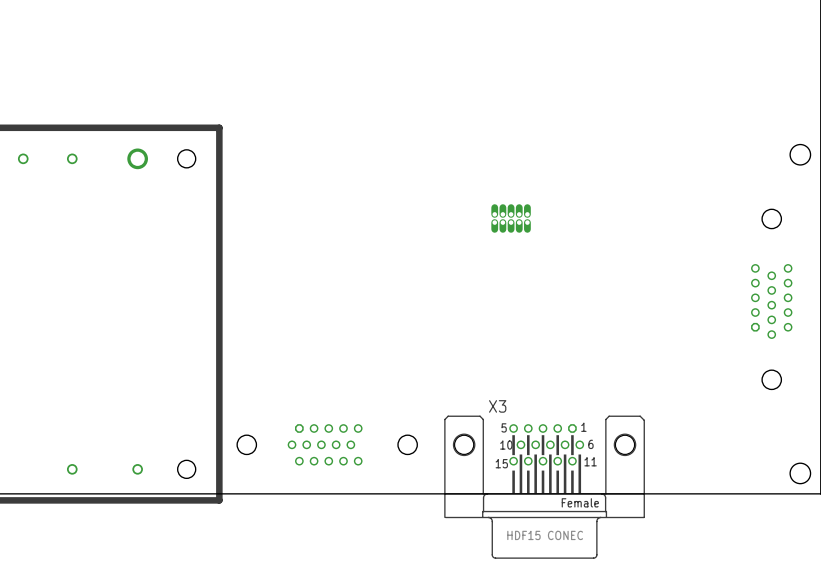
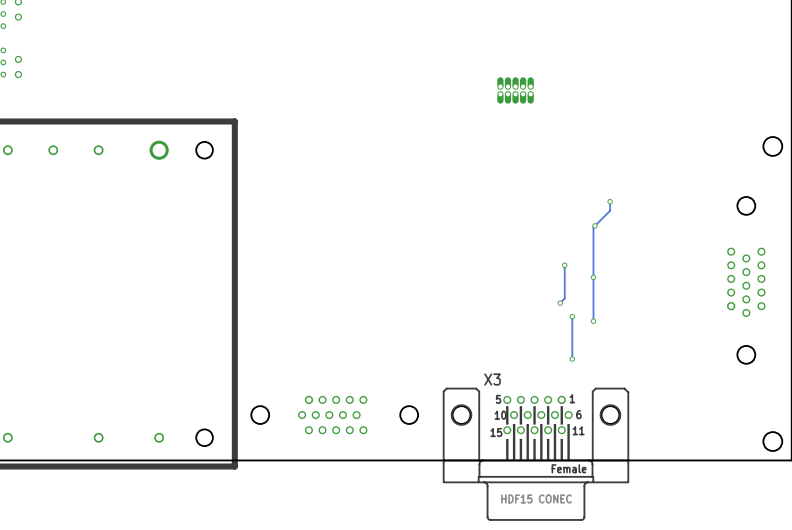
track: none -> (610, 201) (610, 210) (593, 227) (593, 321)
via: none -> (610, 201)
part position: (511, 218) -> (515, 90)
via: none -> (595, 225)
track: none -> (564, 265) (564, 298) (560, 303)
via: none -> (564, 265)
via: none -> (593, 277)
via: none -> (560, 303)
track: none -> (572, 316) (572, 359)
via: none -> (572, 316)
via: none -> (593, 321)
via: none -> (572, 359)

